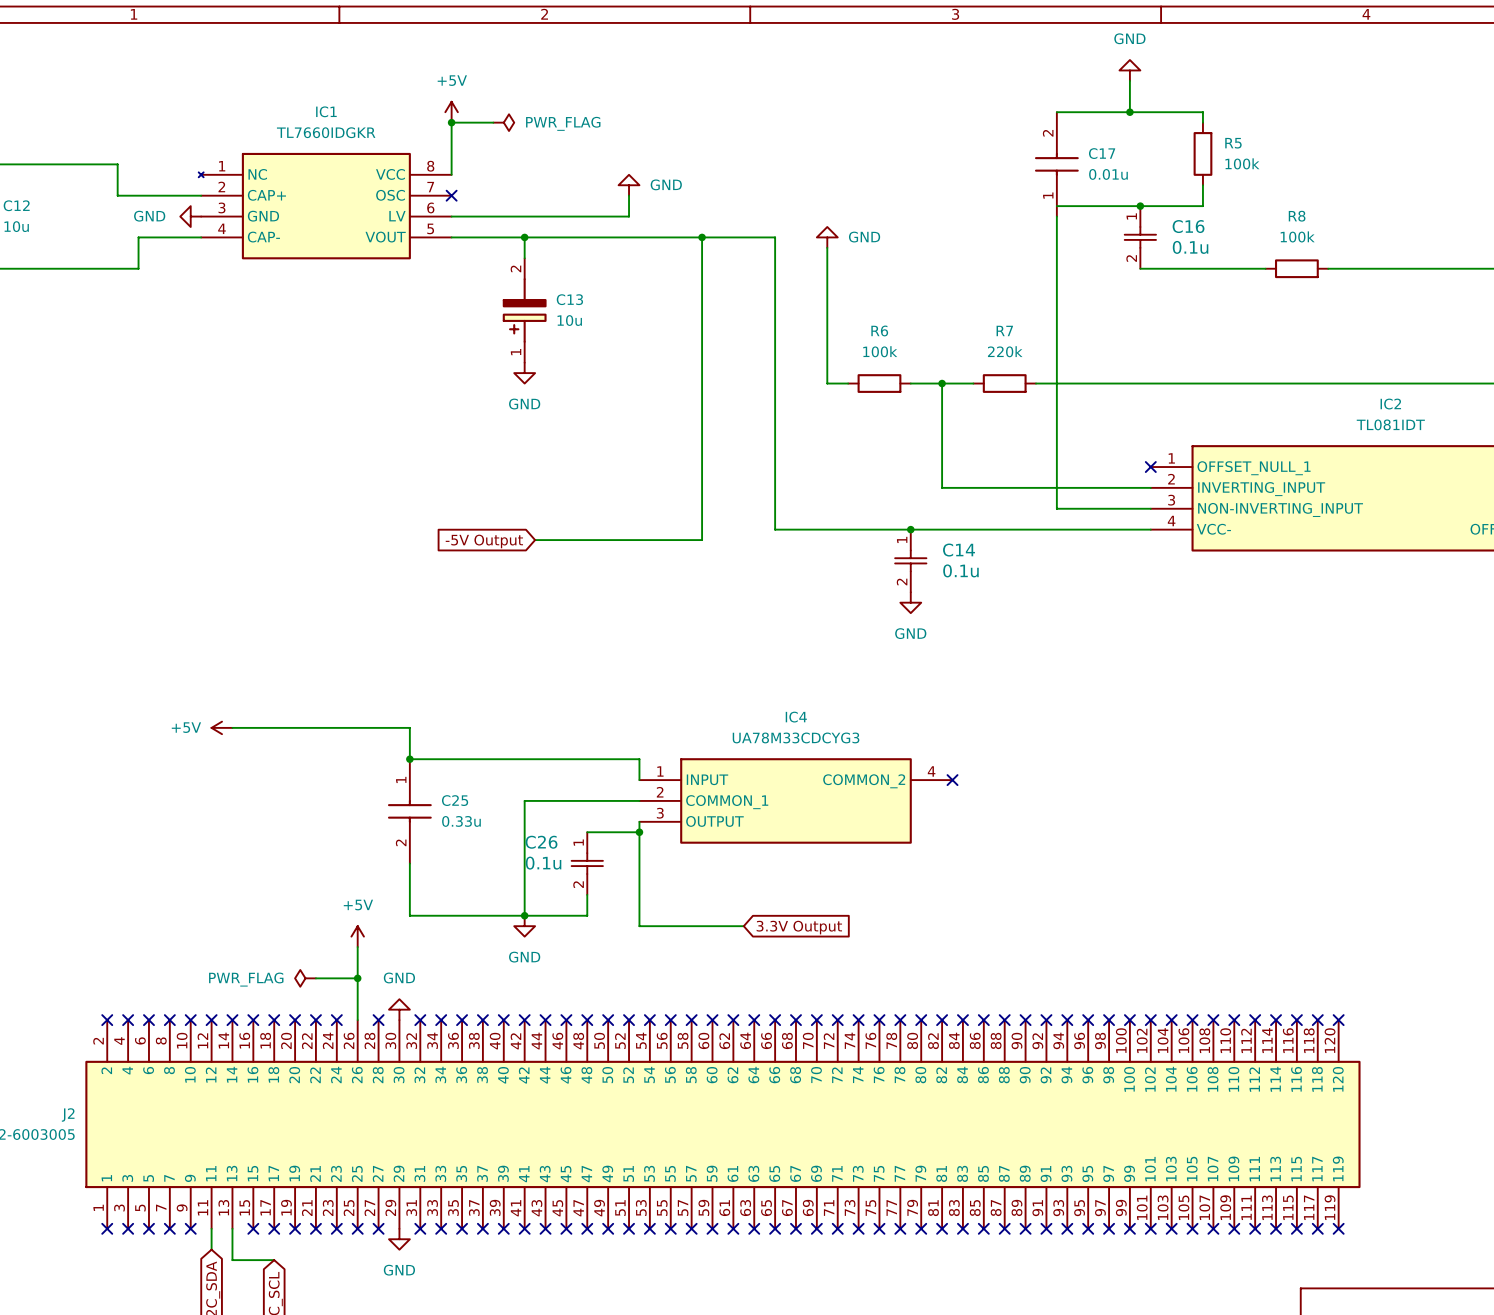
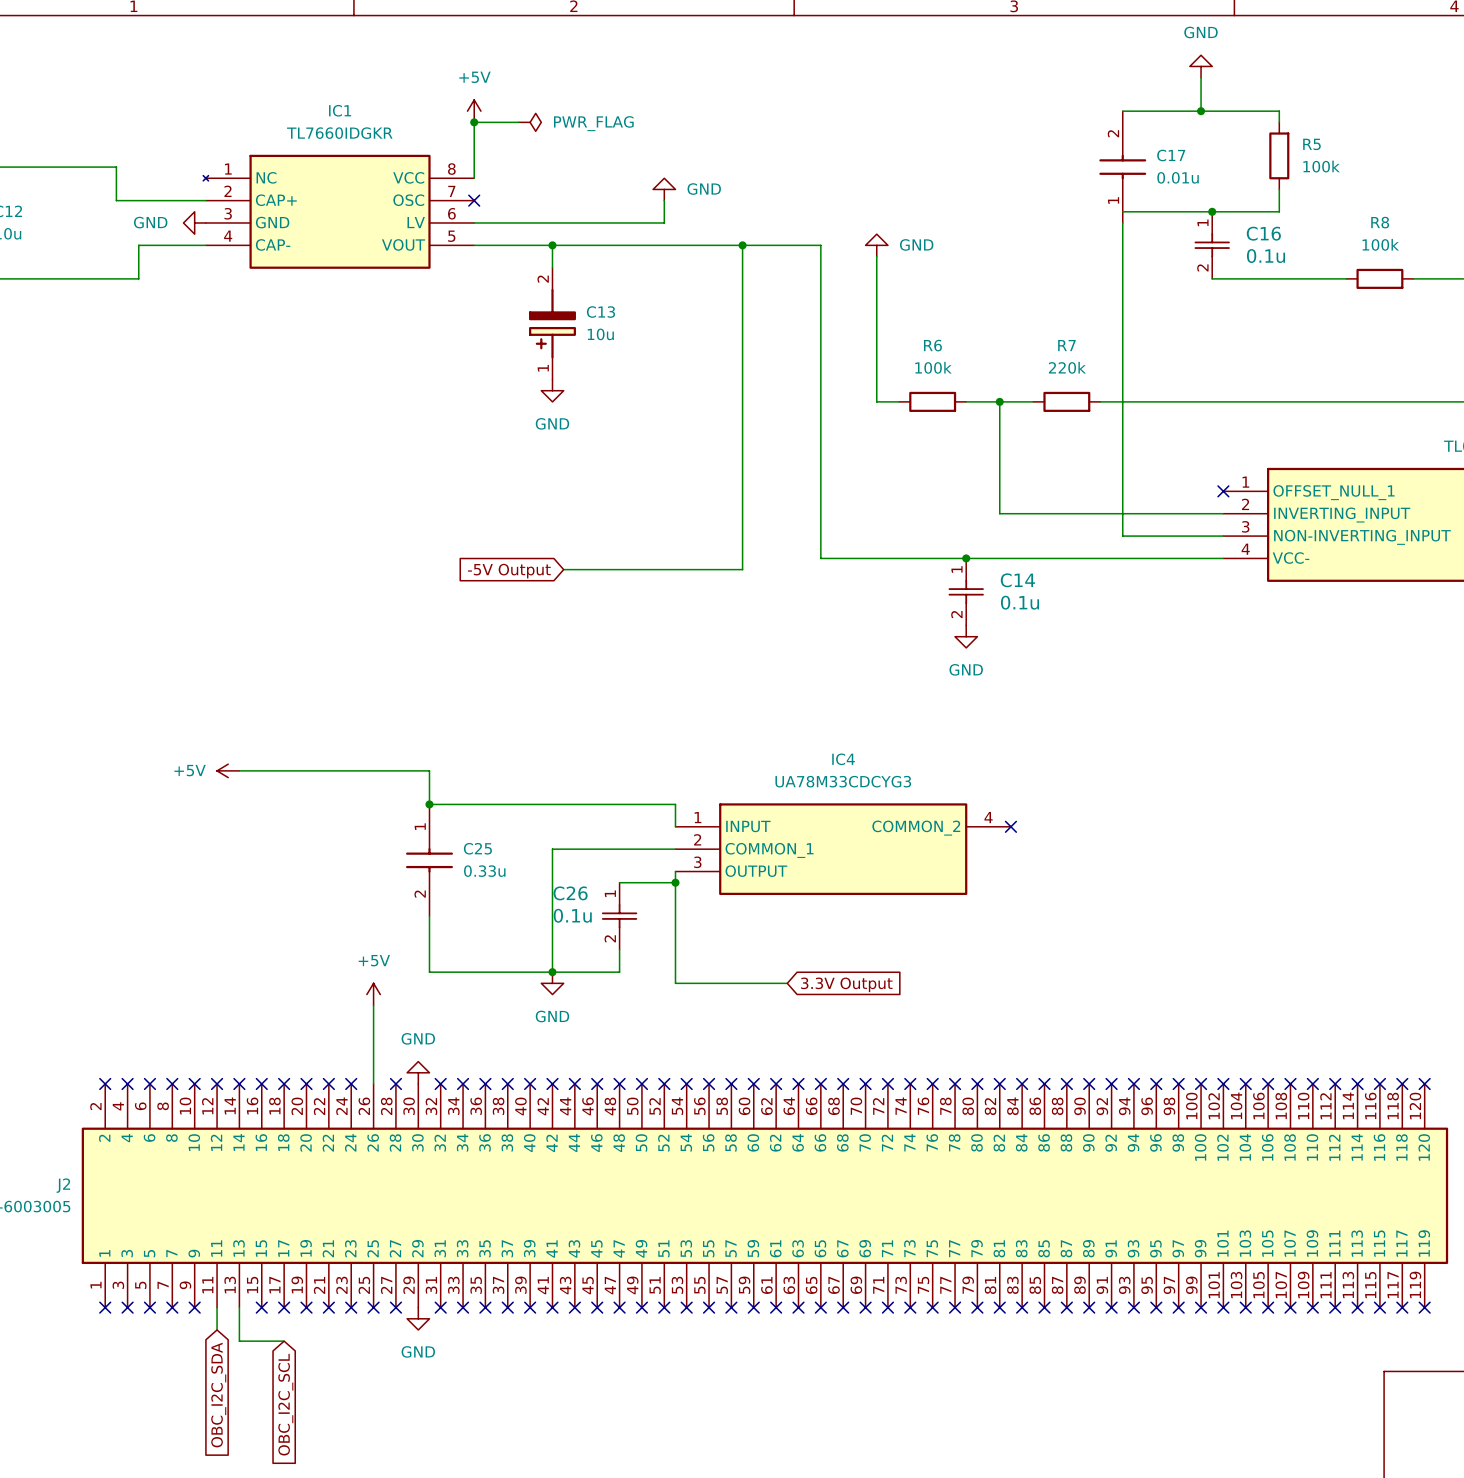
power symbol: PWR_FLAG (305, 978) -> none
wire: (315, 978) (357, 978) -> none
junction: (357, 978) -> none

